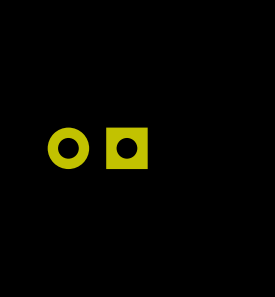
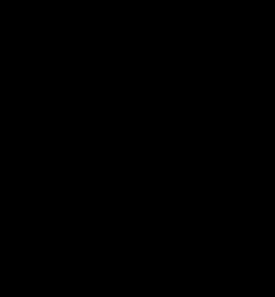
part: (97, 148) -> none

